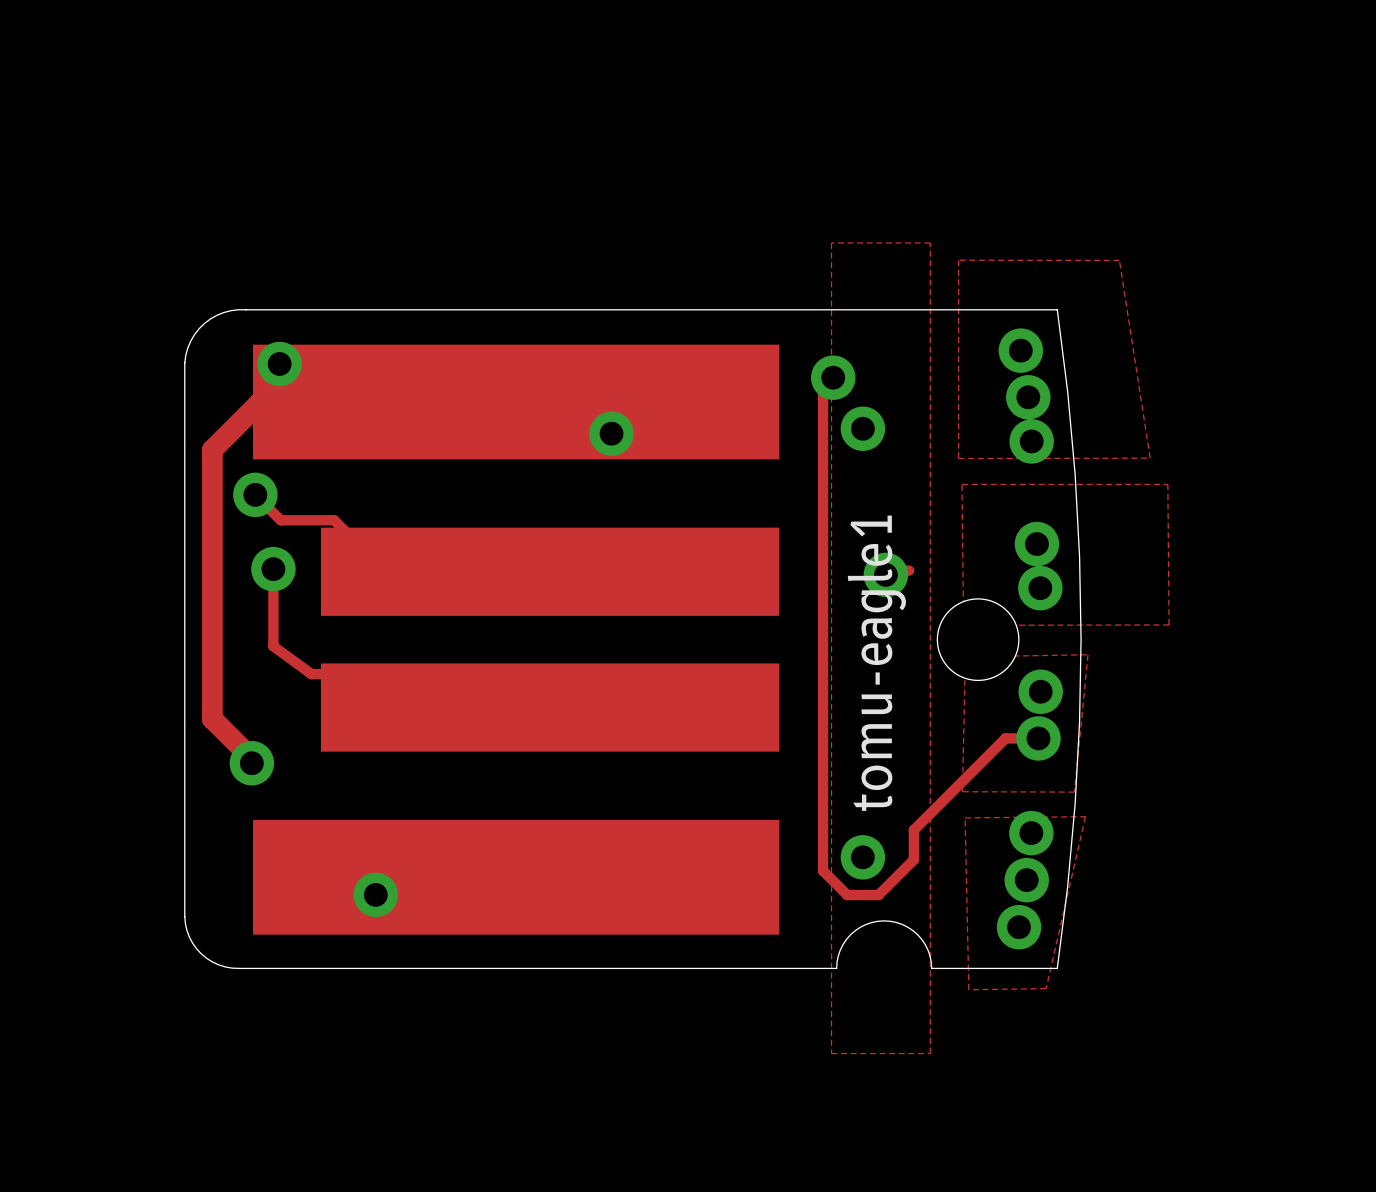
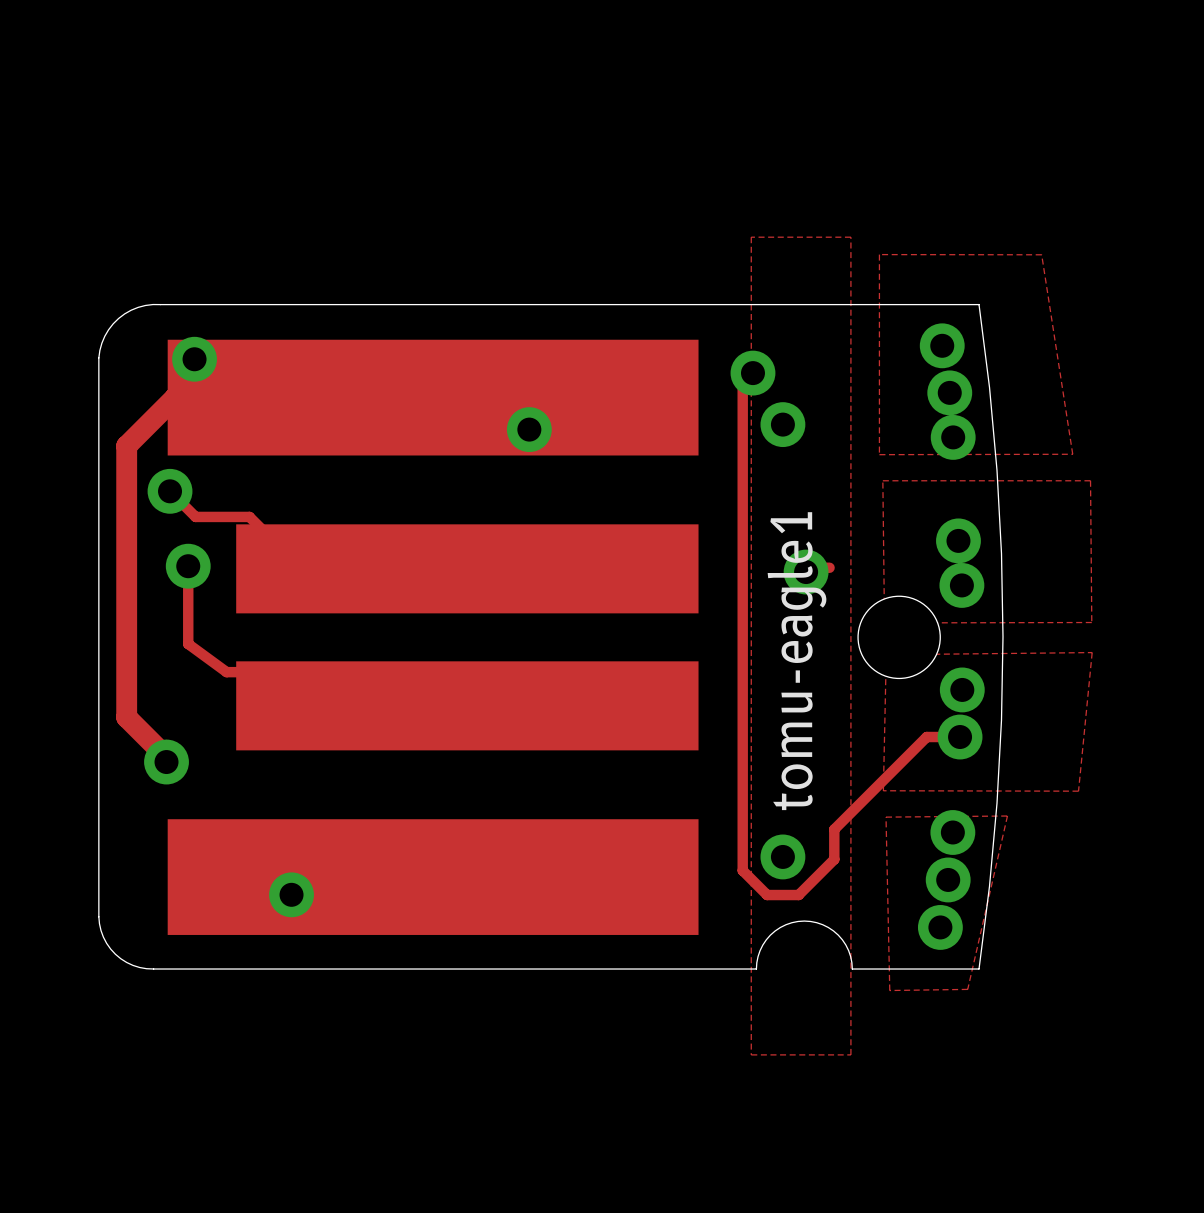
zone outline: (965, 656) (1087, 654) (1074, 792) (962, 791) -> (886, 654) (1092, 652) (1078, 791) (883, 790)

